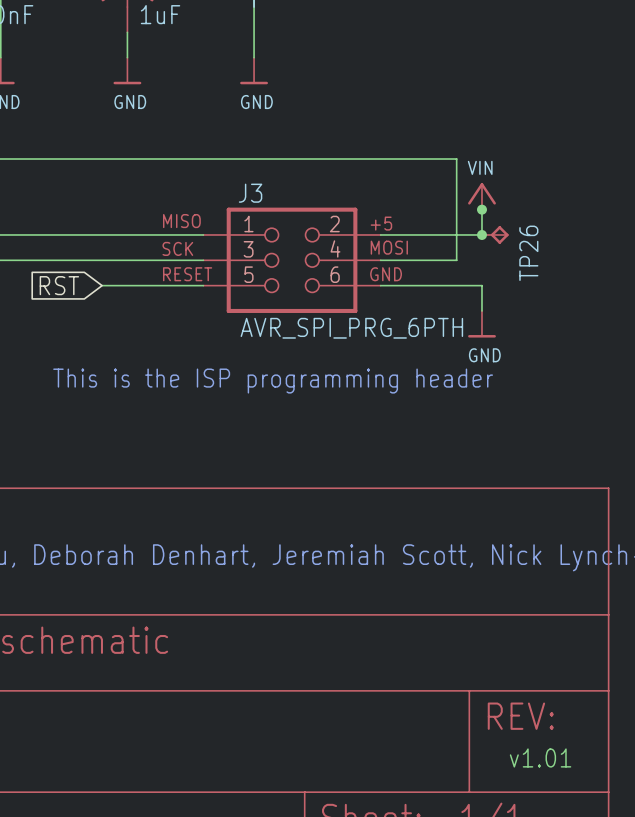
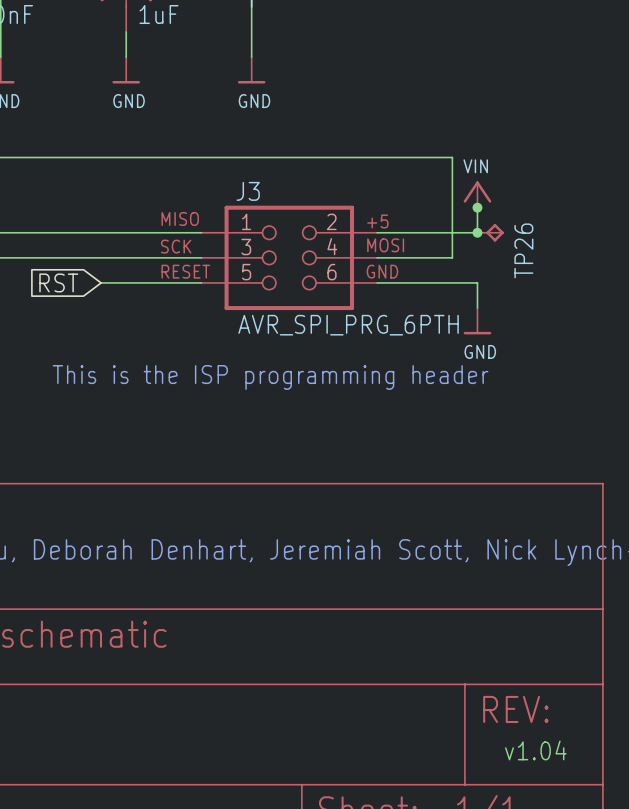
text: v1.01 (540, 757) -> v1.04 (535, 750)

